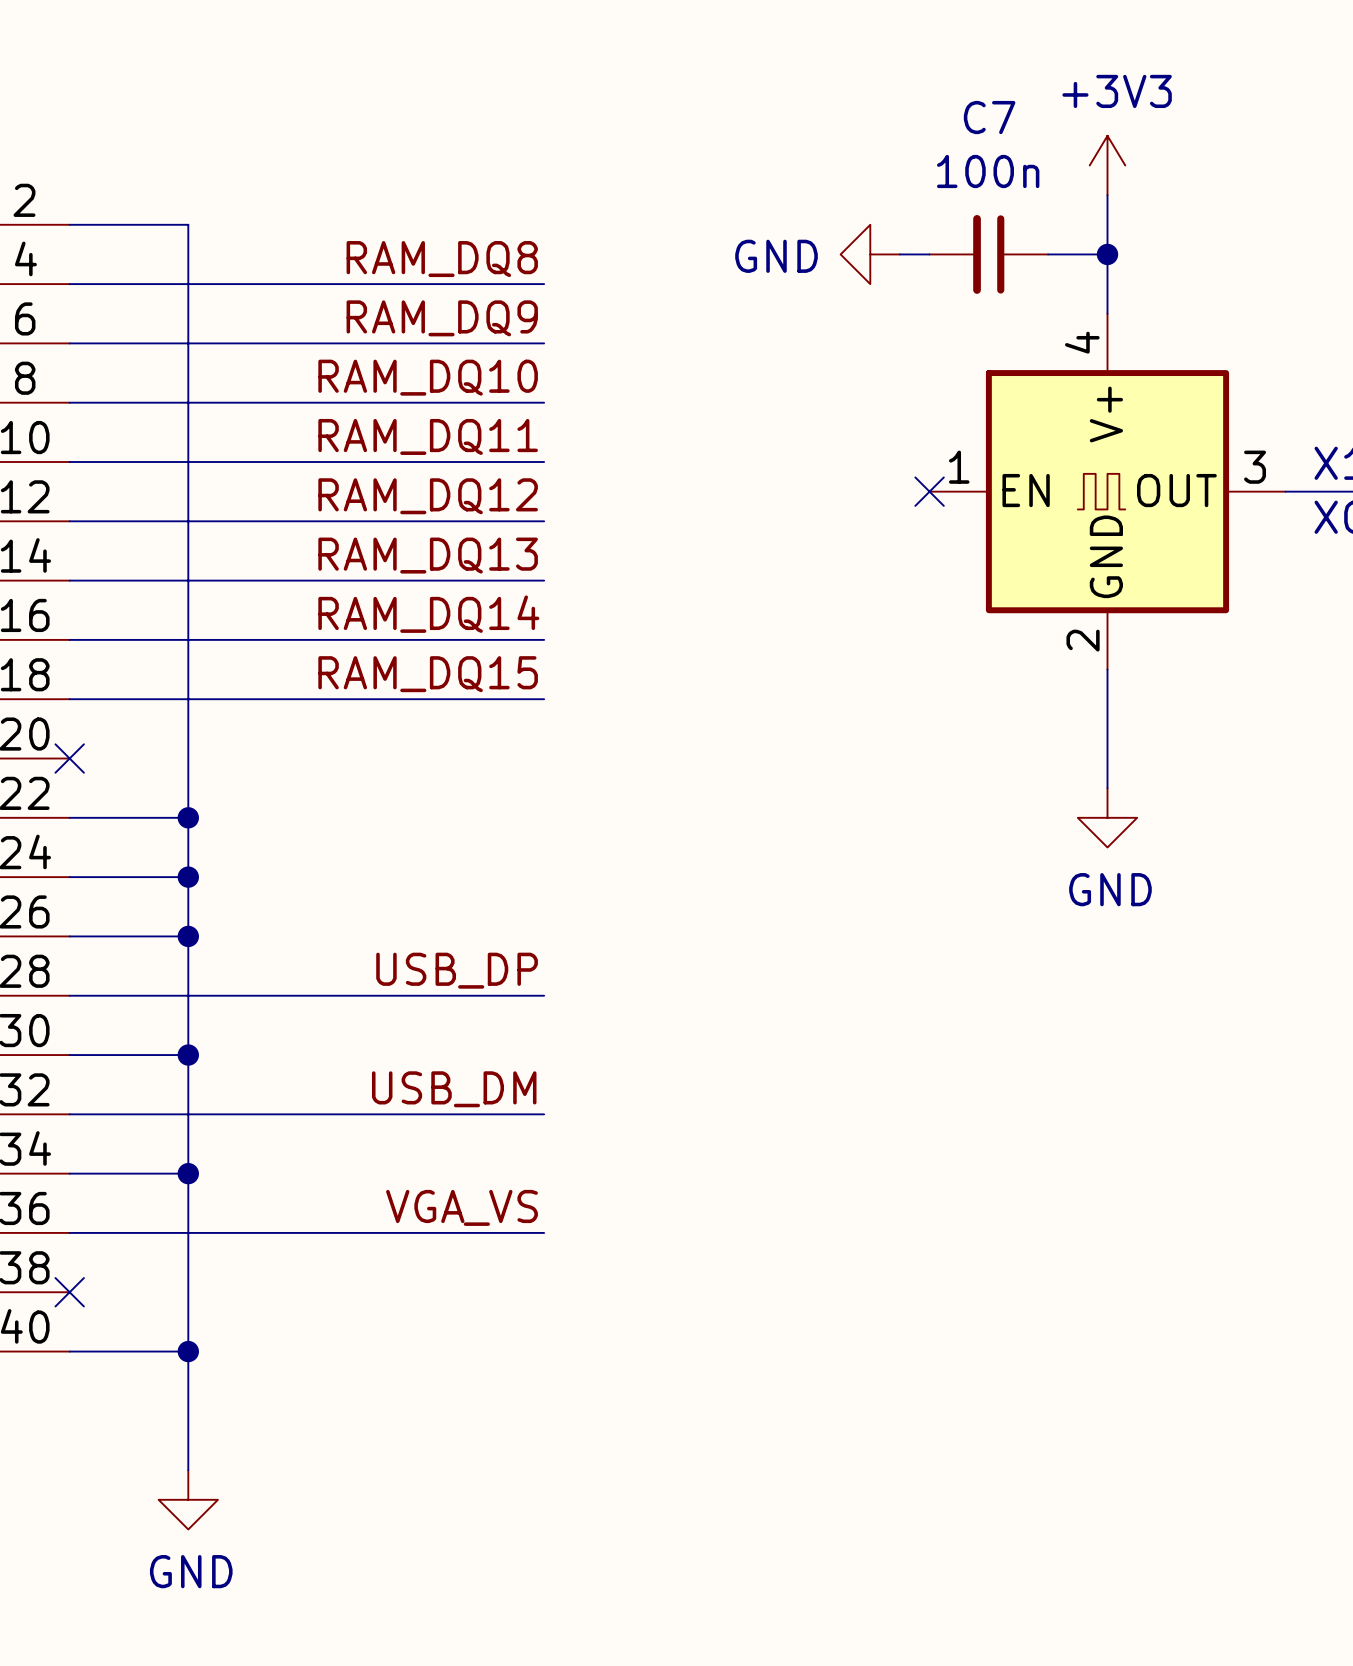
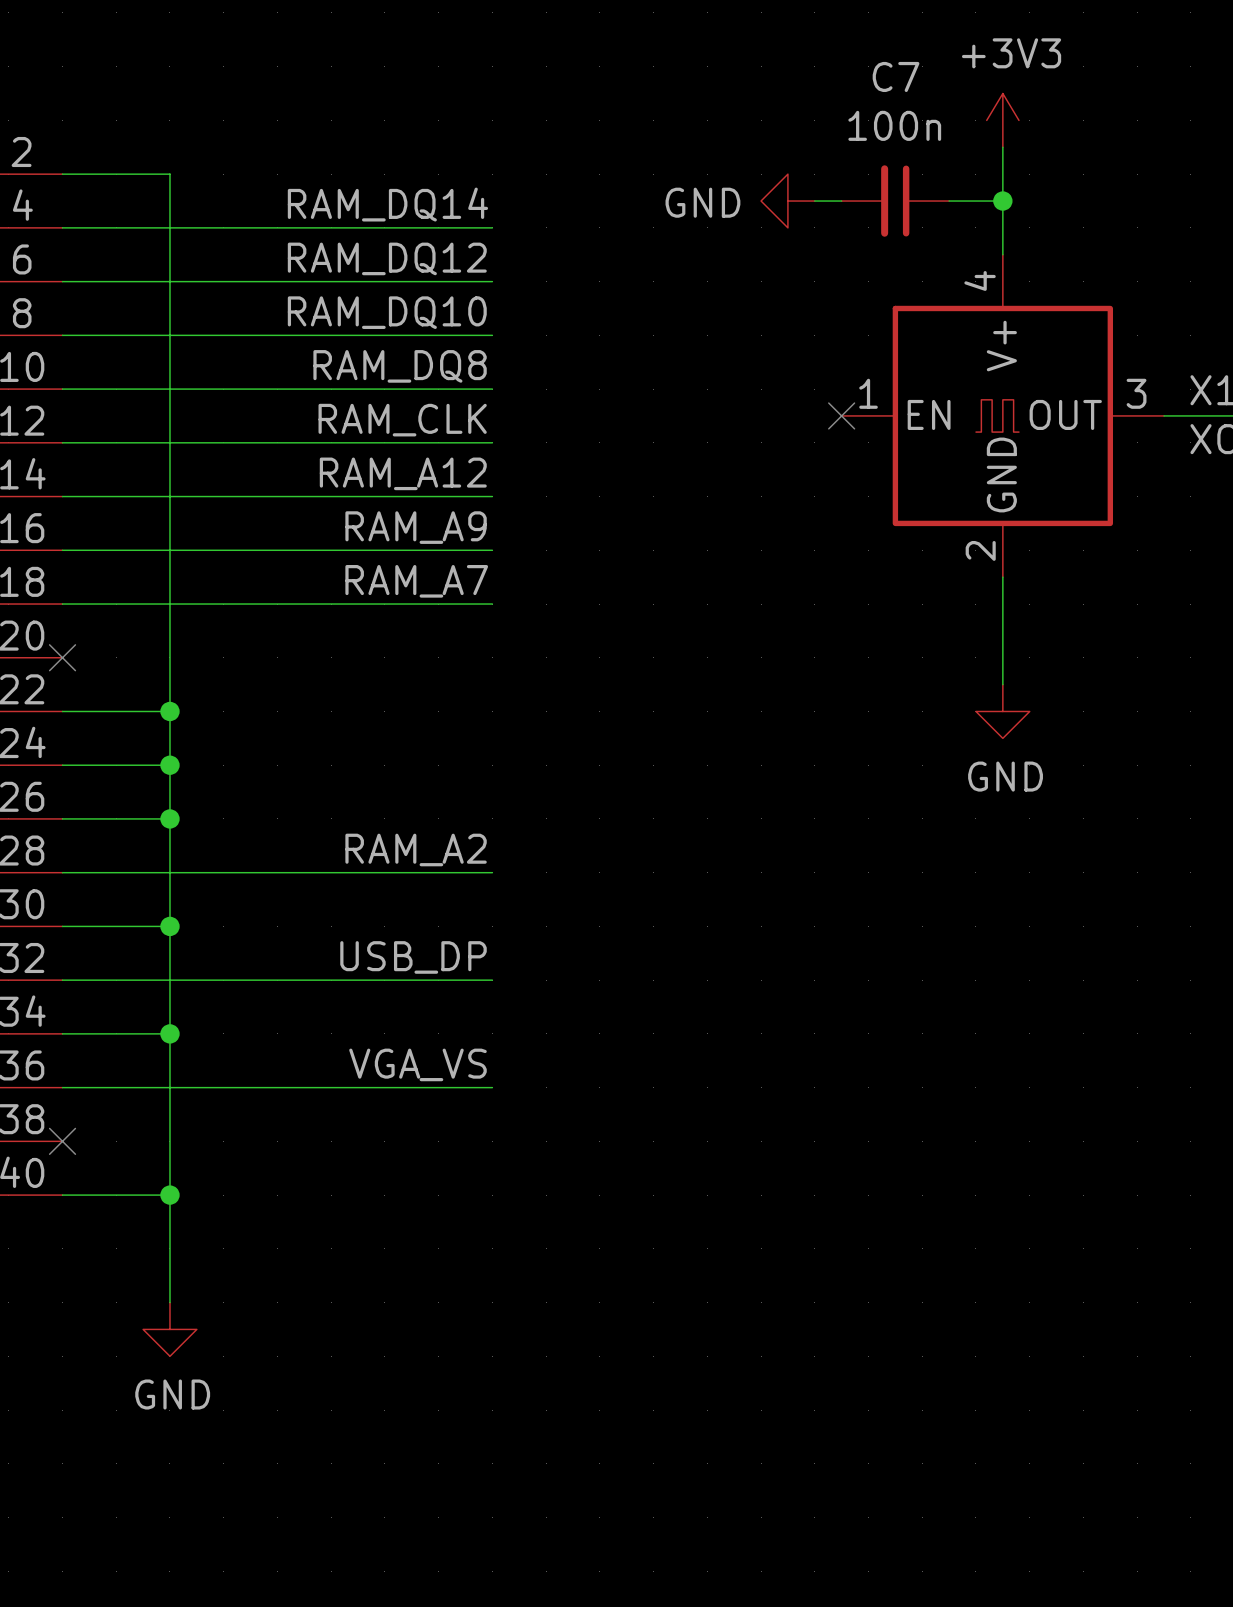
label: RAM_DQ8 (442, 259) -> RAM_DQ14 (387, 204)
label: RAM_DQ9 (442, 318) -> RAM_DQ12 (387, 258)
label: RAM_DQ11 (428, 436) -> RAM_DQ8 (400, 366)
label: RAM_DQ12 (428, 496) -> RAM_CLK (402, 420)
label: RAM_DQ13 (428, 555) -> RAM_A12 (403, 473)
label: RAM_DQ14 (428, 614) -> RAM_A9 (416, 527)
label: RAM_DQ15 (428, 674) -> RAM_A7 (416, 581)
label: USB_DP (457, 970) -> RAM_A2 (416, 849)
label: USB_DM (454, 1089) -> USB_DP (413, 957)

